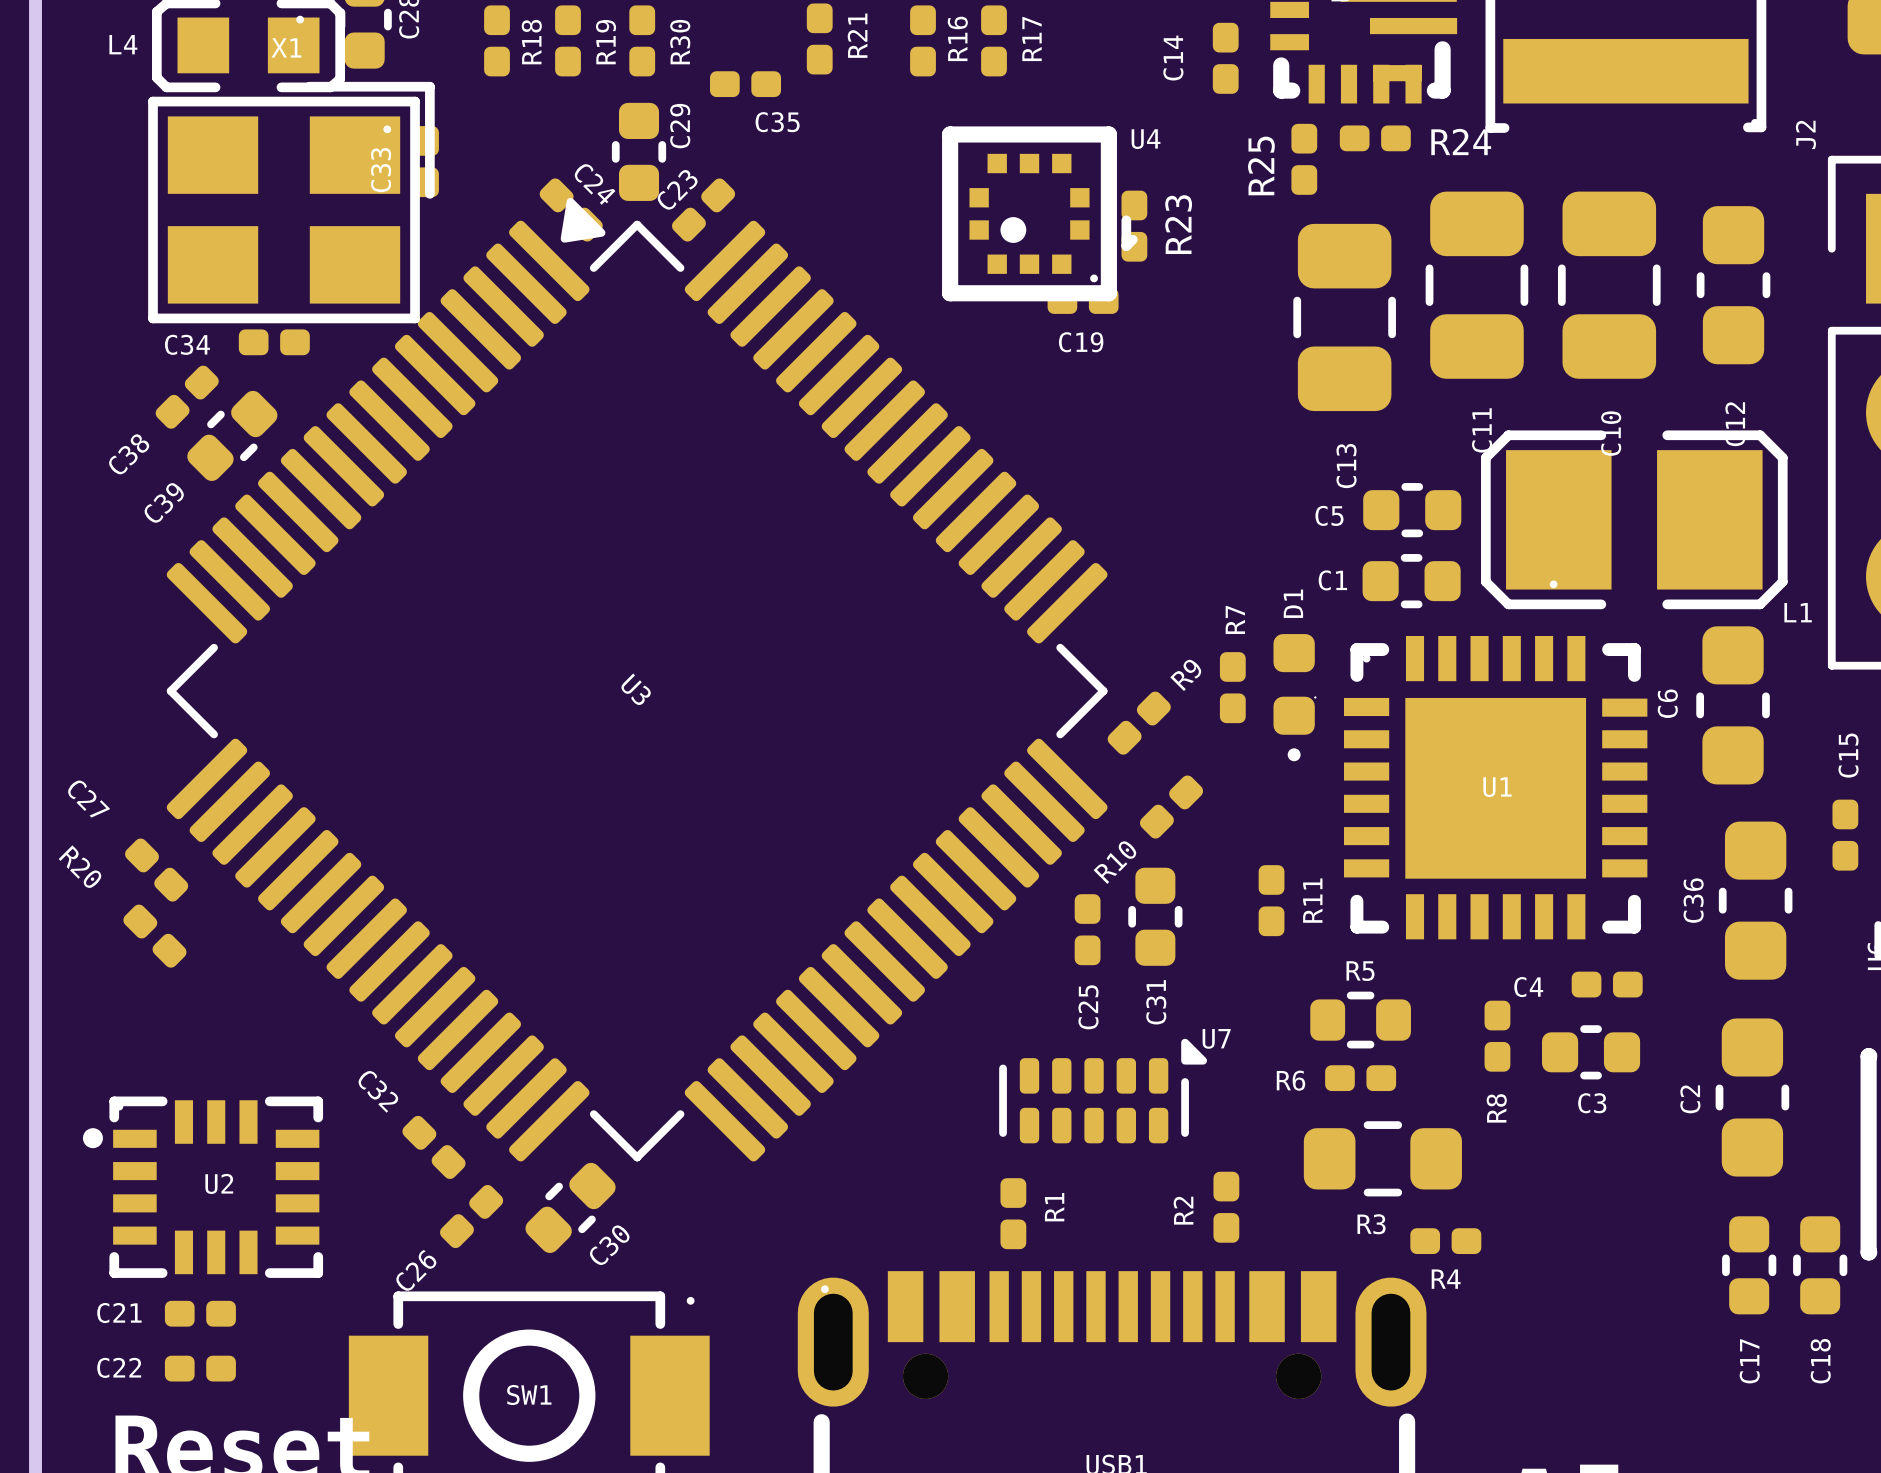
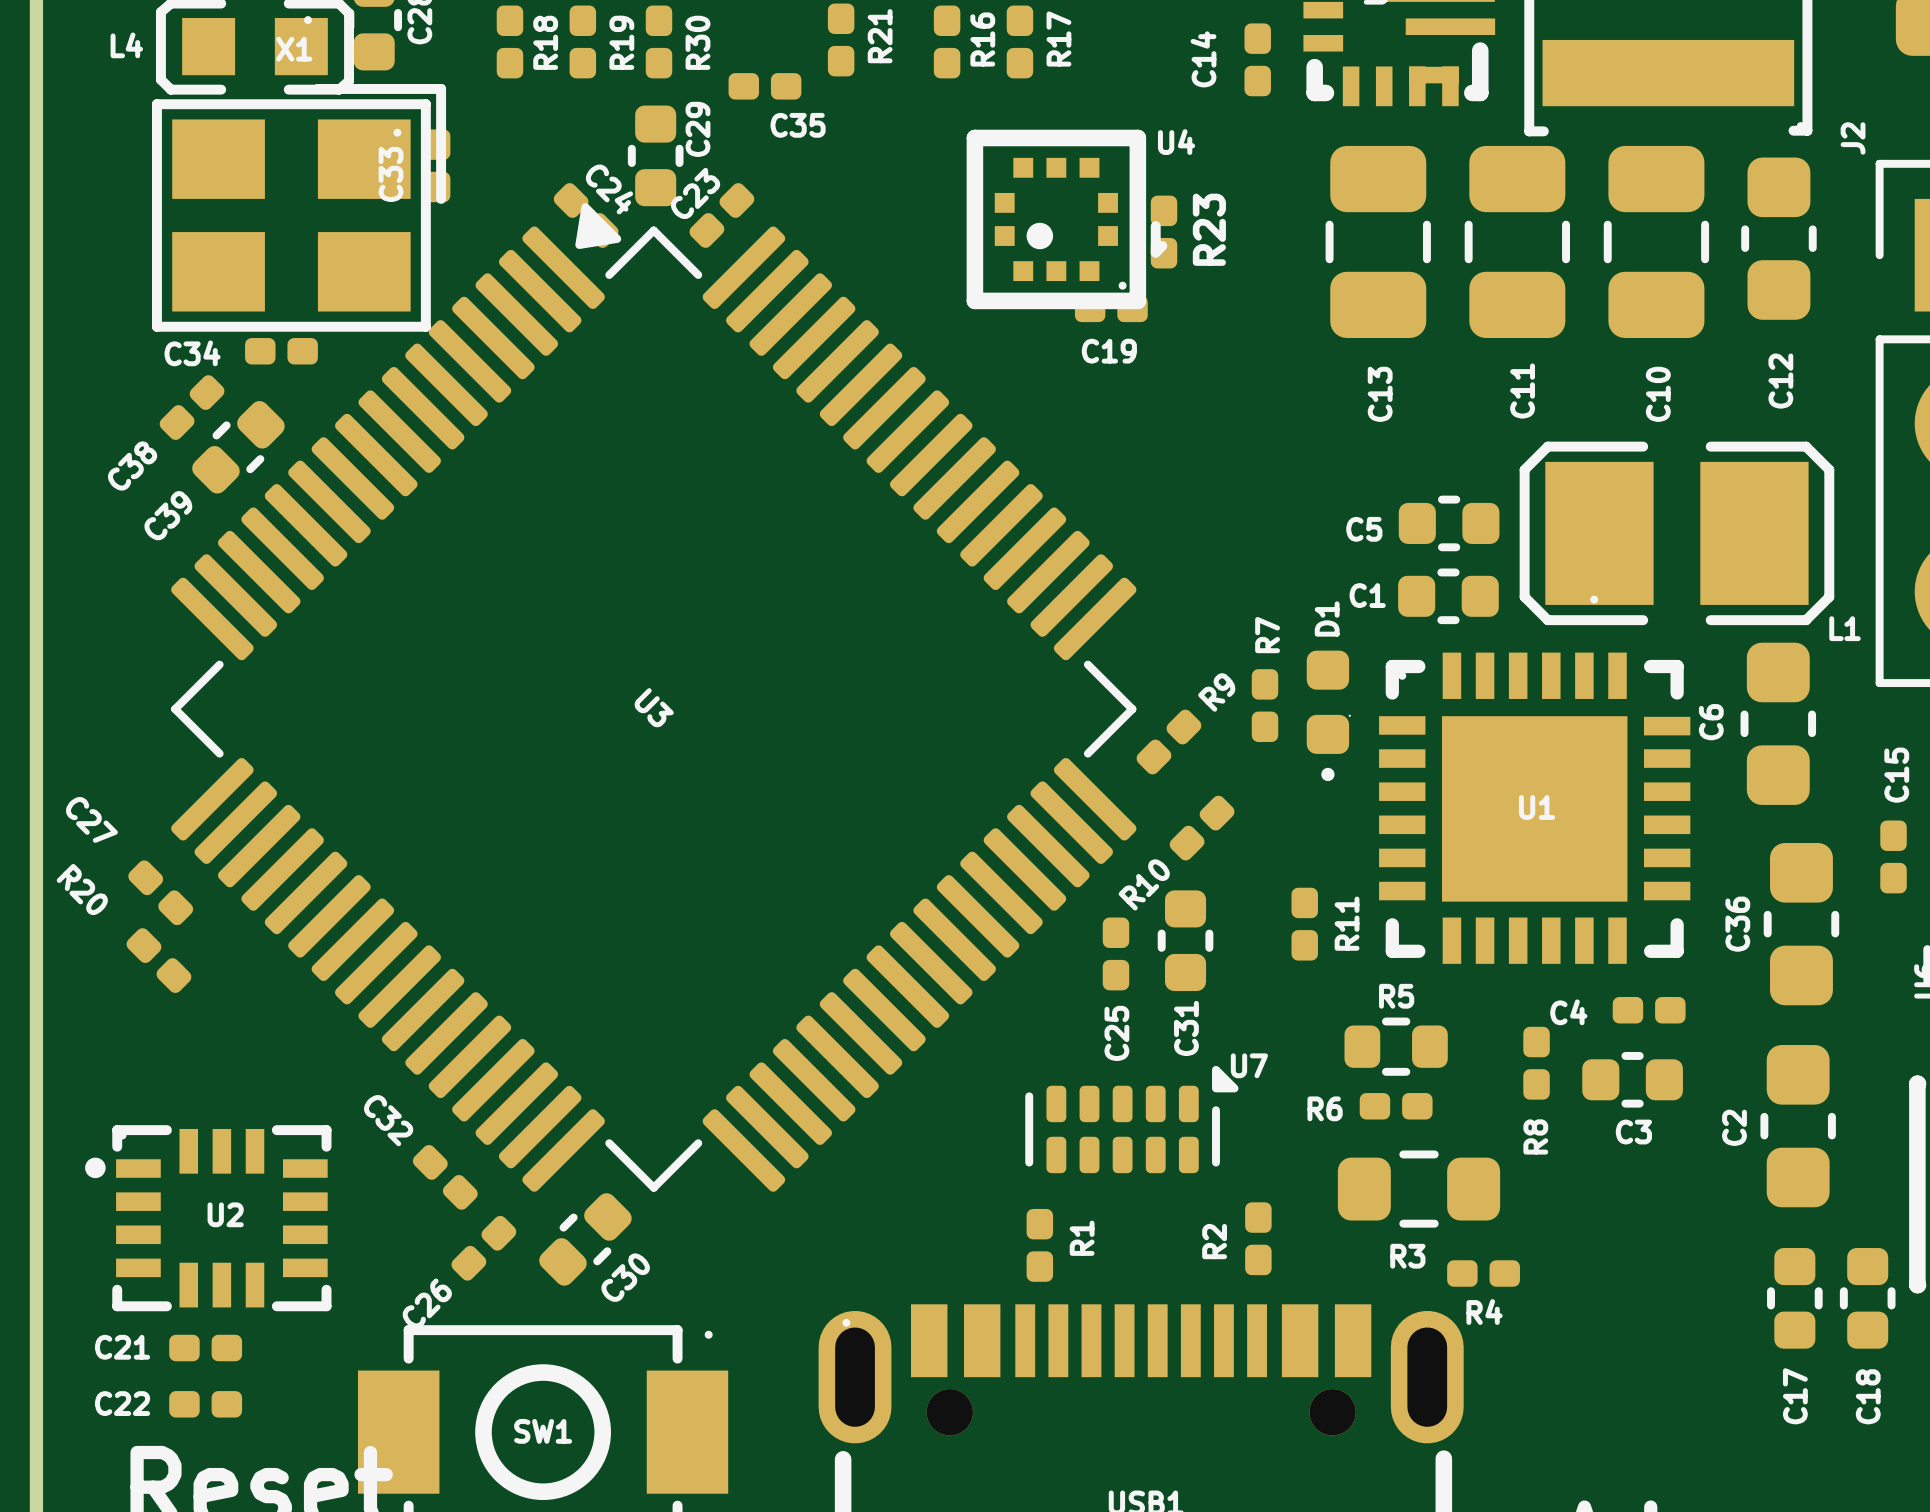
R24: (1375, 138) -> none
R25: (1304, 159) -> none
C11 position: (1476, 285) -> (1517, 241)
C10 position: (1609, 285) -> (1656, 241)
C12 position: (1733, 285) -> (1778, 238)
C13 position: (1344, 317) -> (1378, 241)

